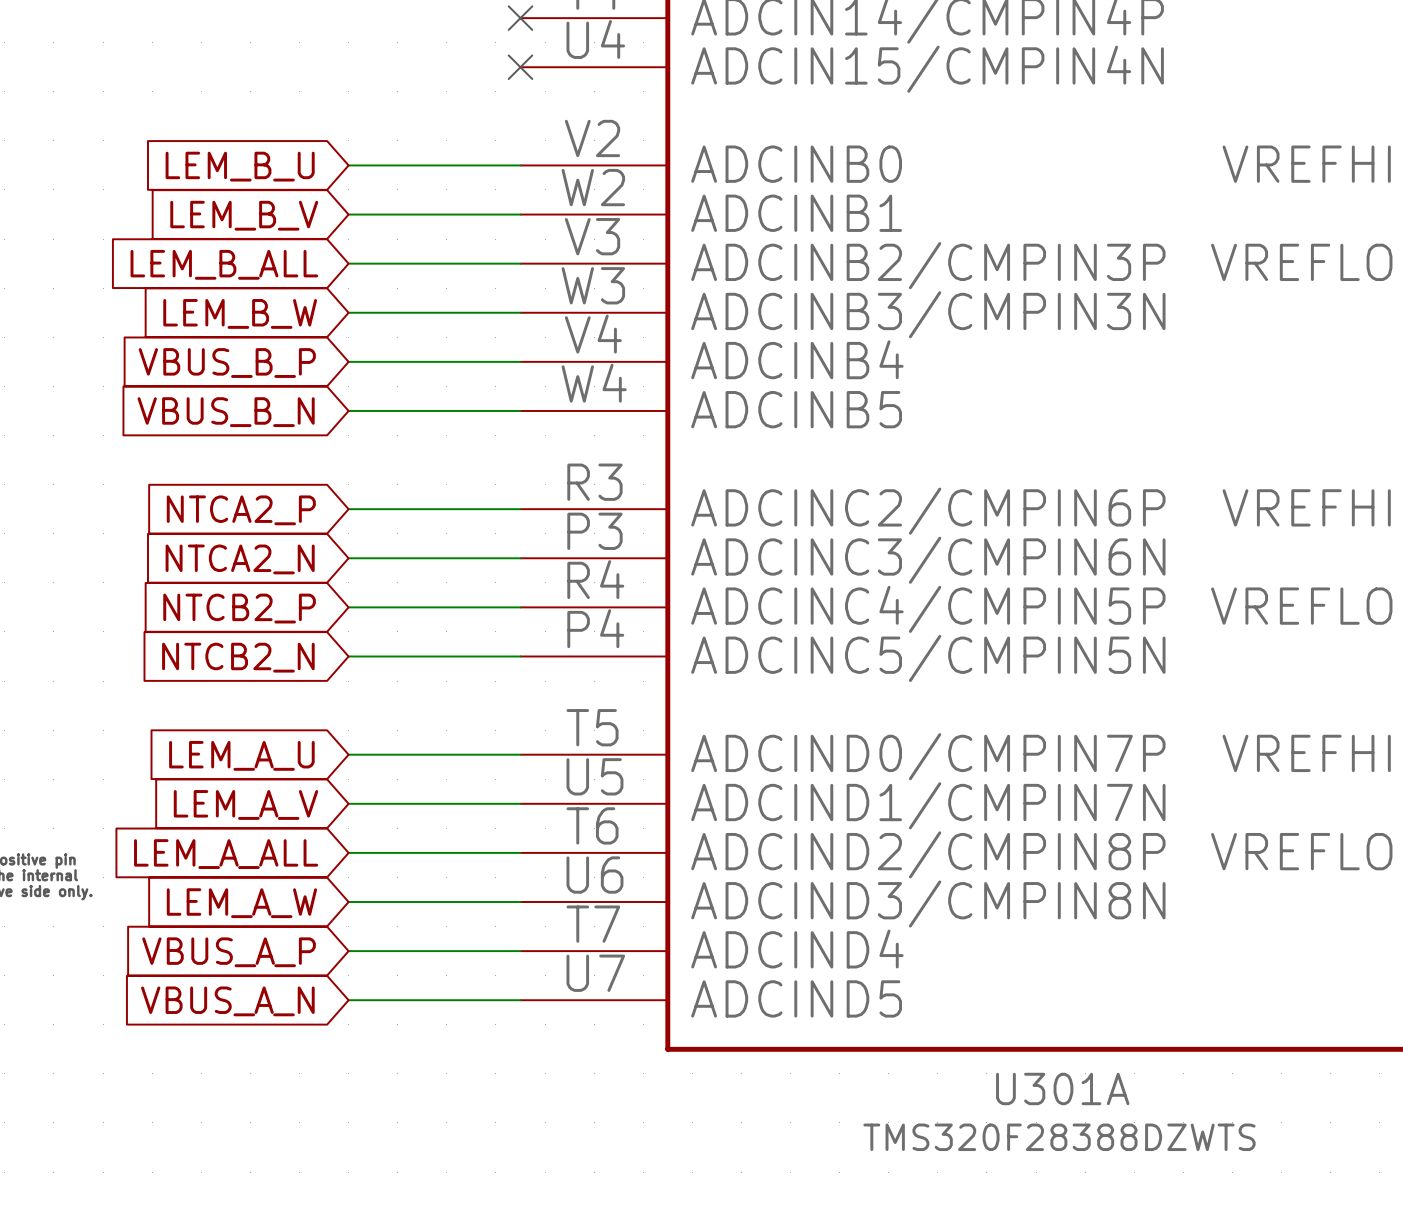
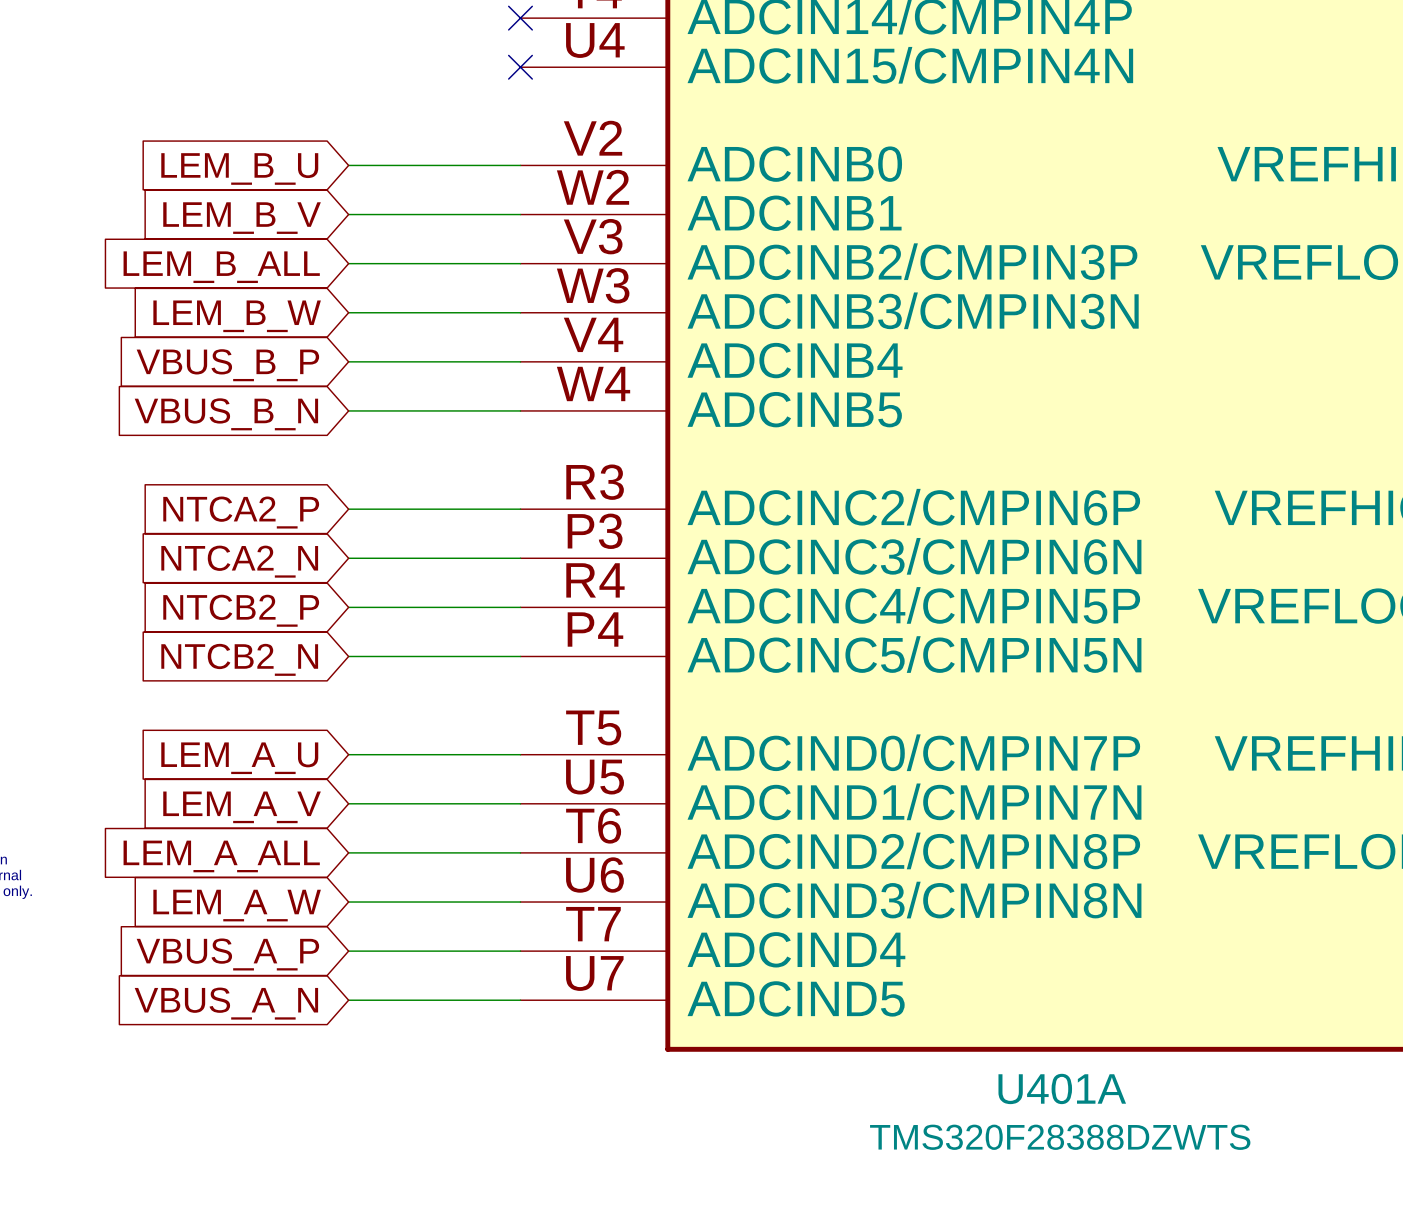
U301A name: U301A (1062, 1088) -> U401A (1062, 1088)

